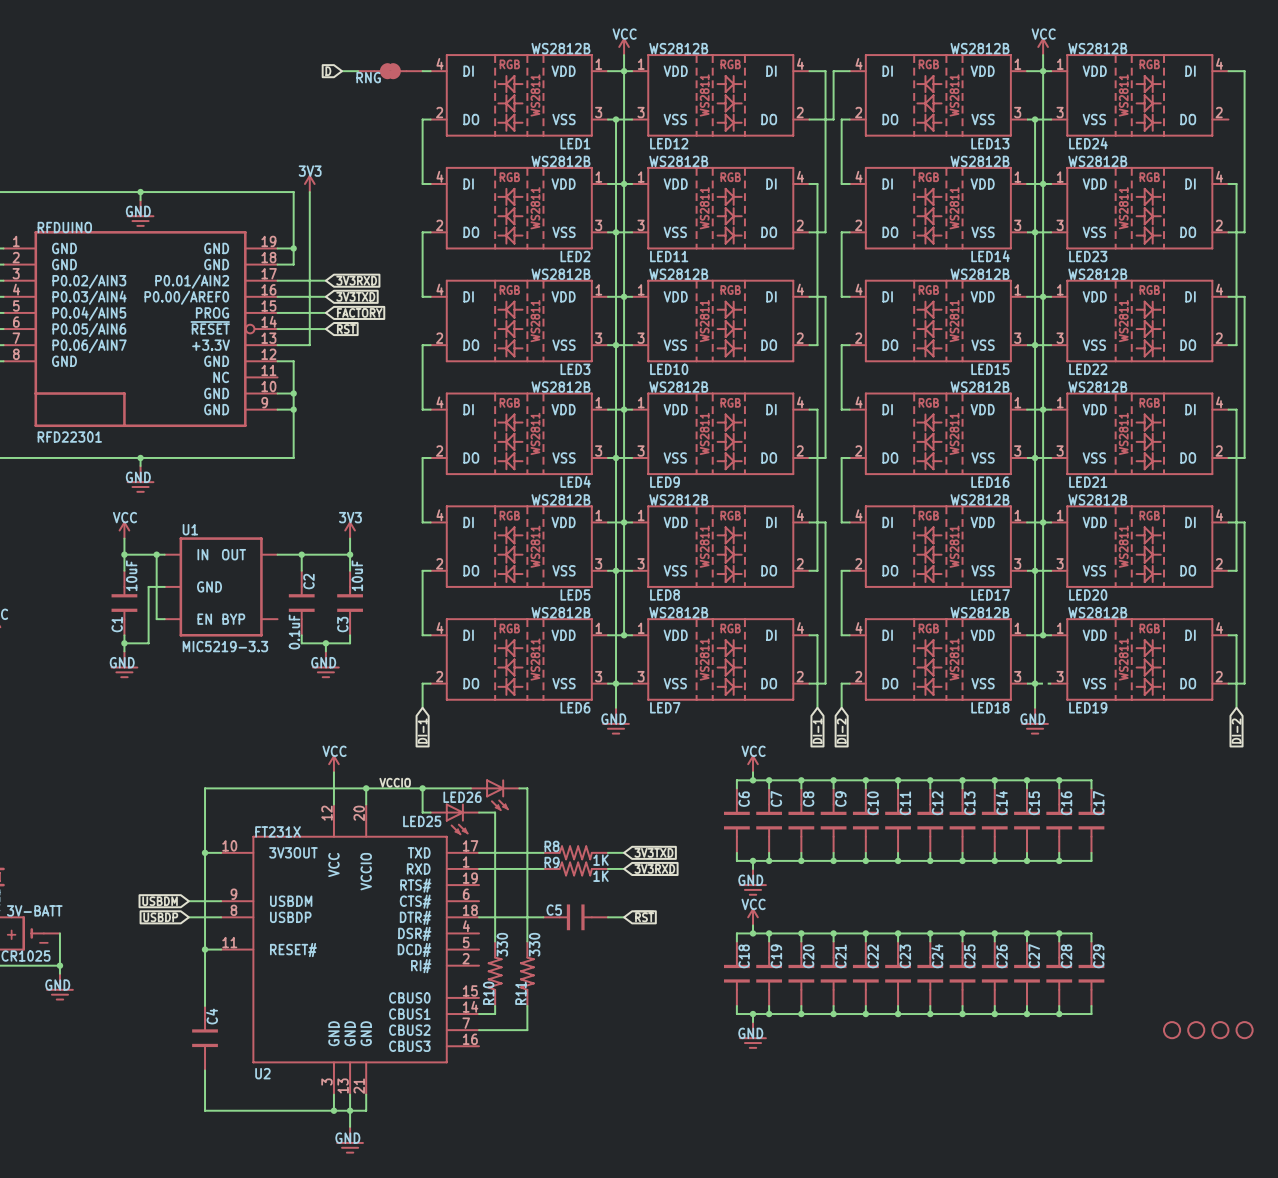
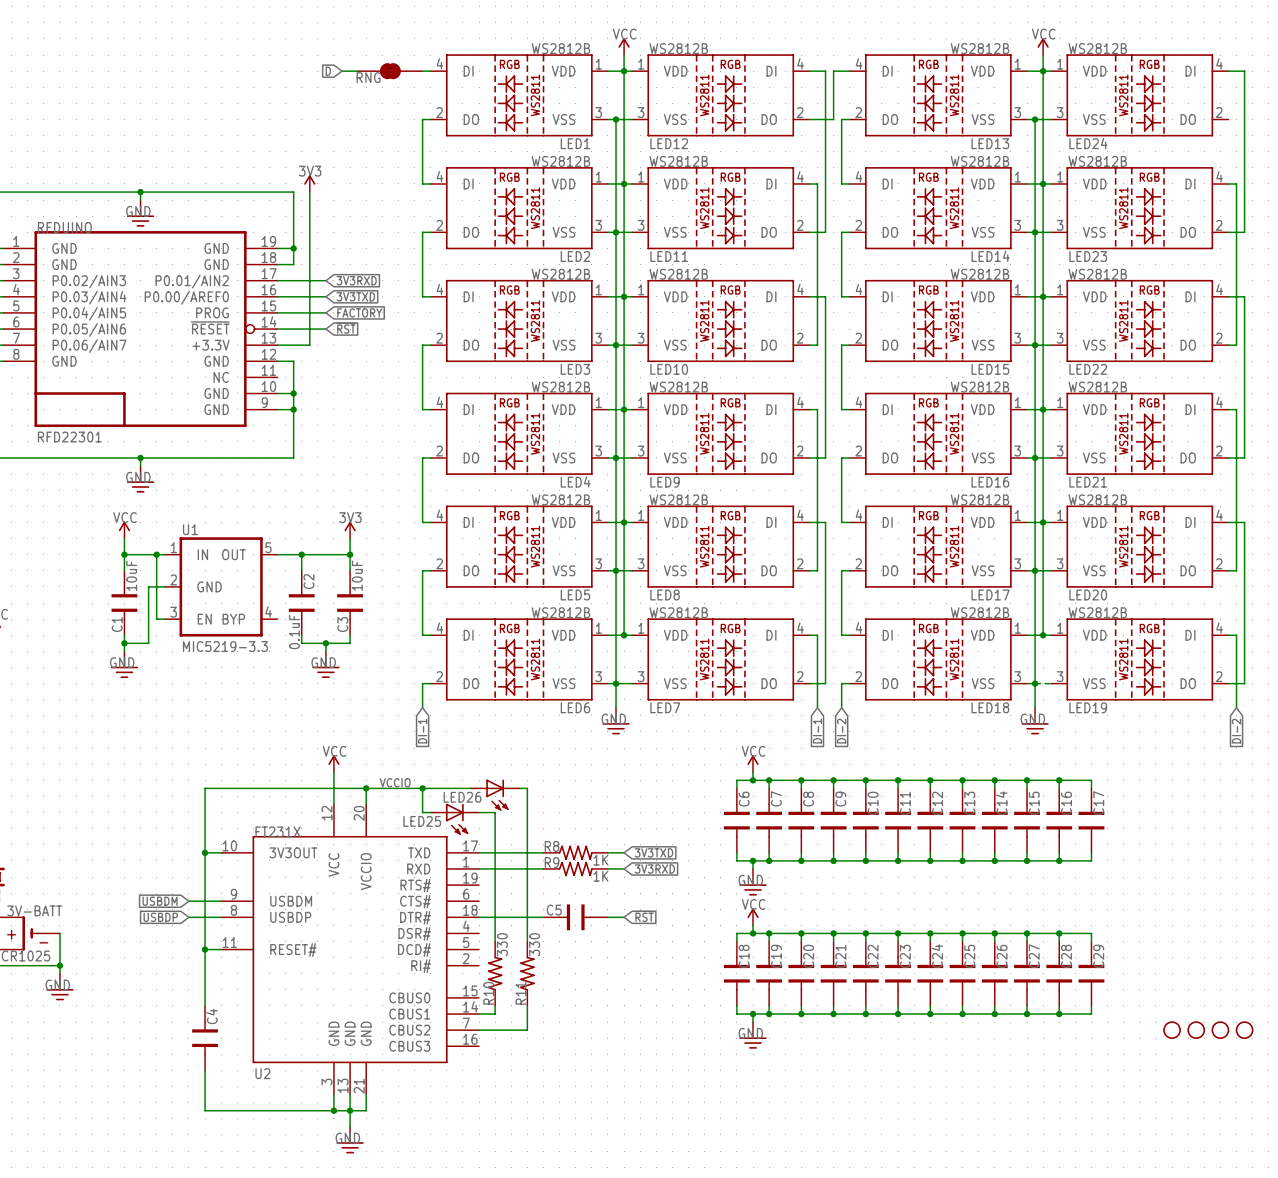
U1 pin number: none -> 1 (173, 547)
U1 pin number: none -> 5 (268, 547)
U1 pin number: none -> 2 (173, 579)
U1 pin number: none -> 4 (268, 611)
U1 pin number: none -> 3 (173, 612)

